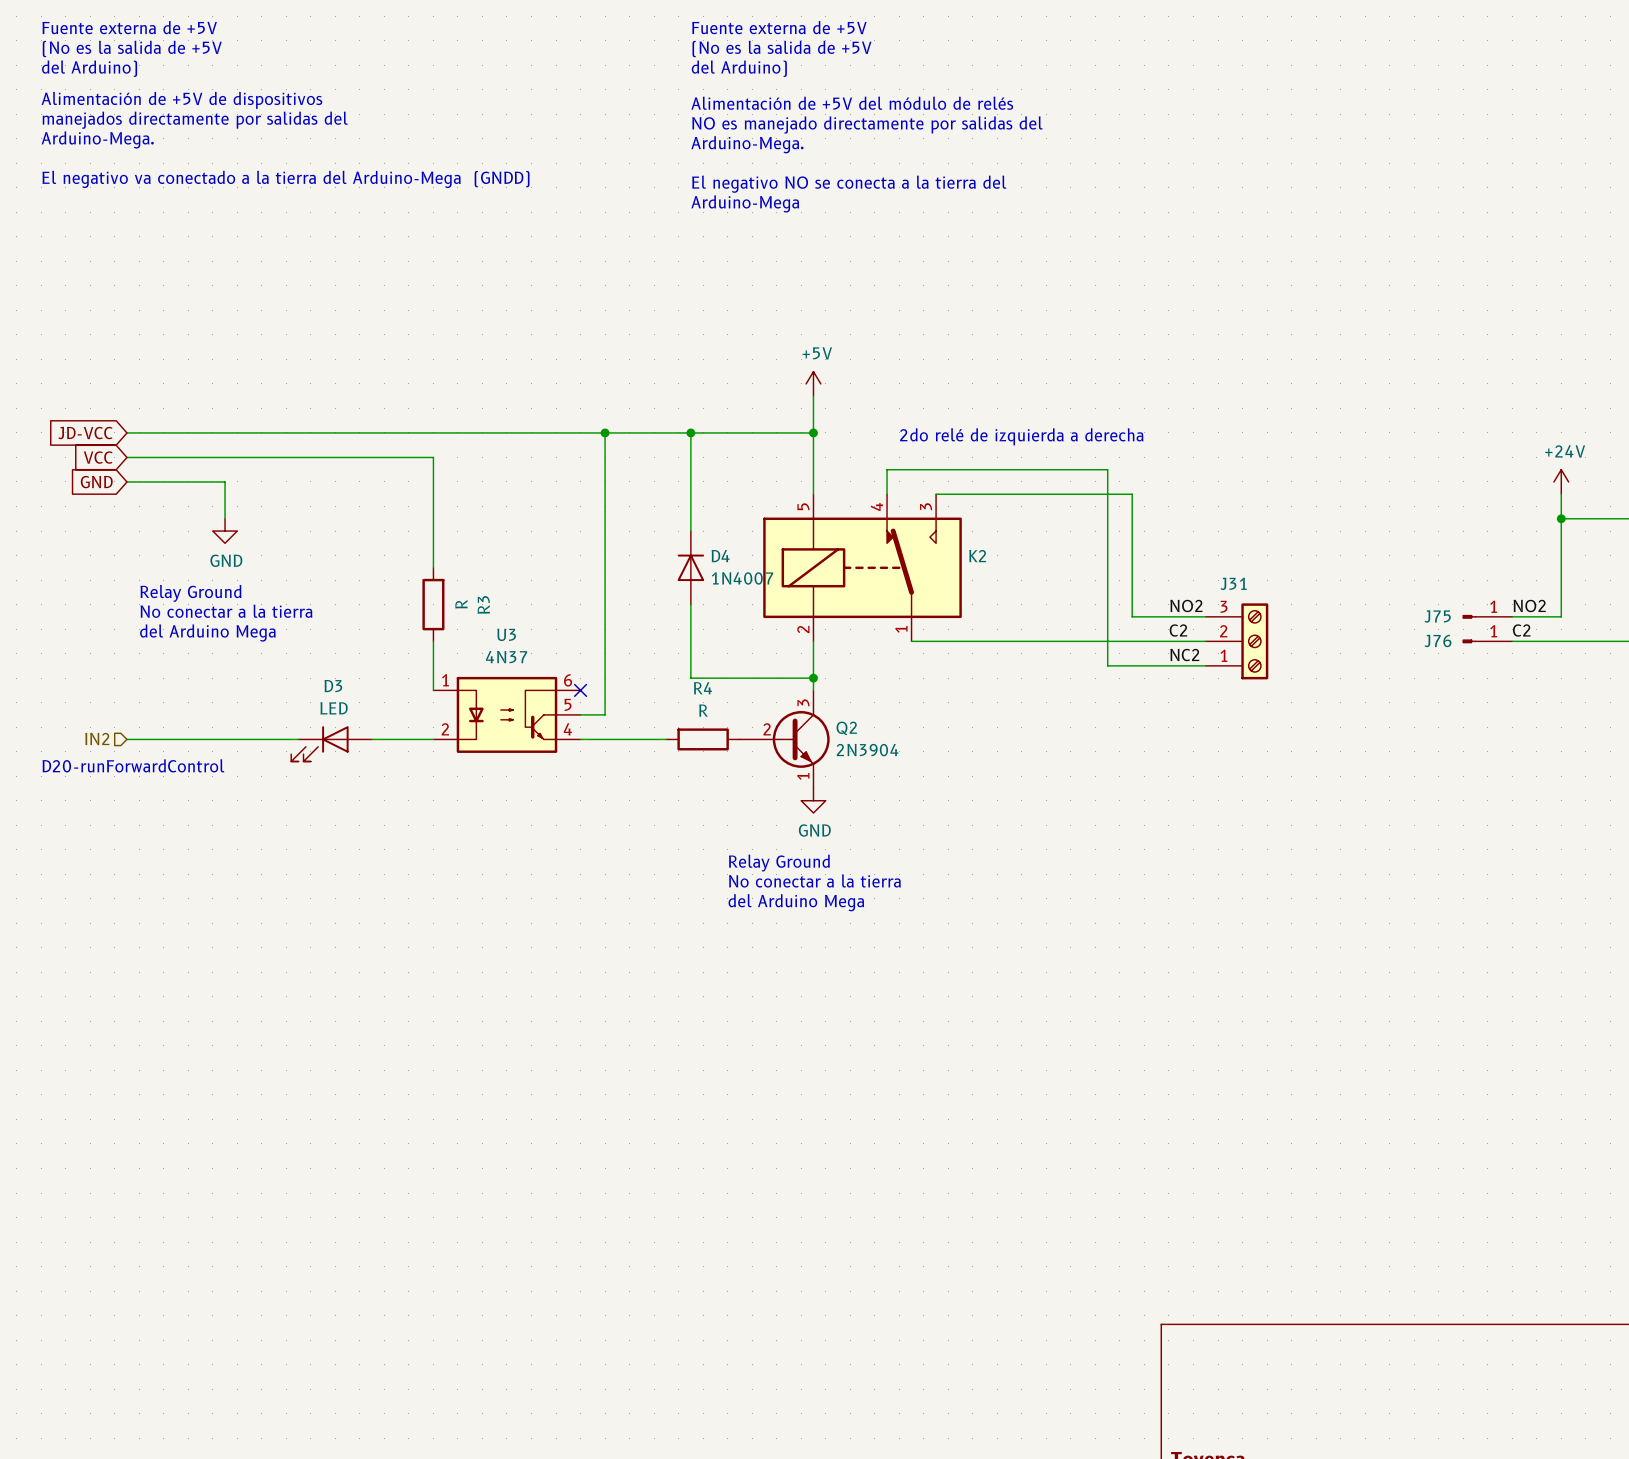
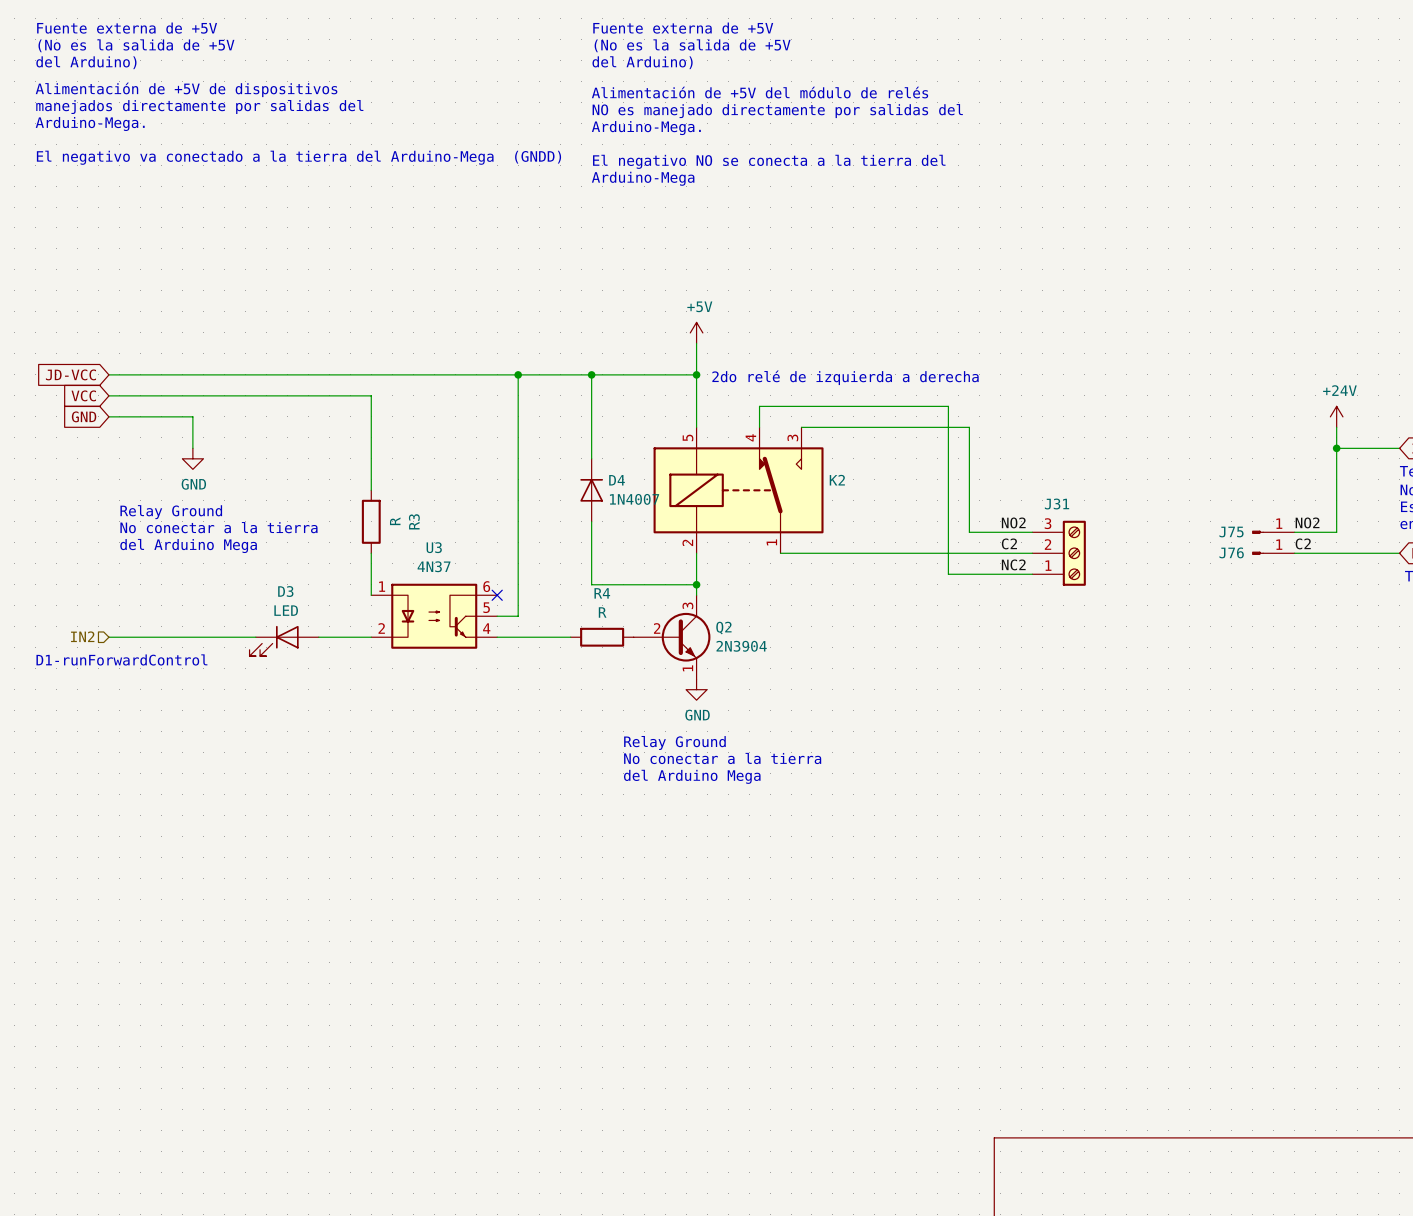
text: D20-runForwardControl (133, 765) -> D1-runForwardControl (121, 659)

